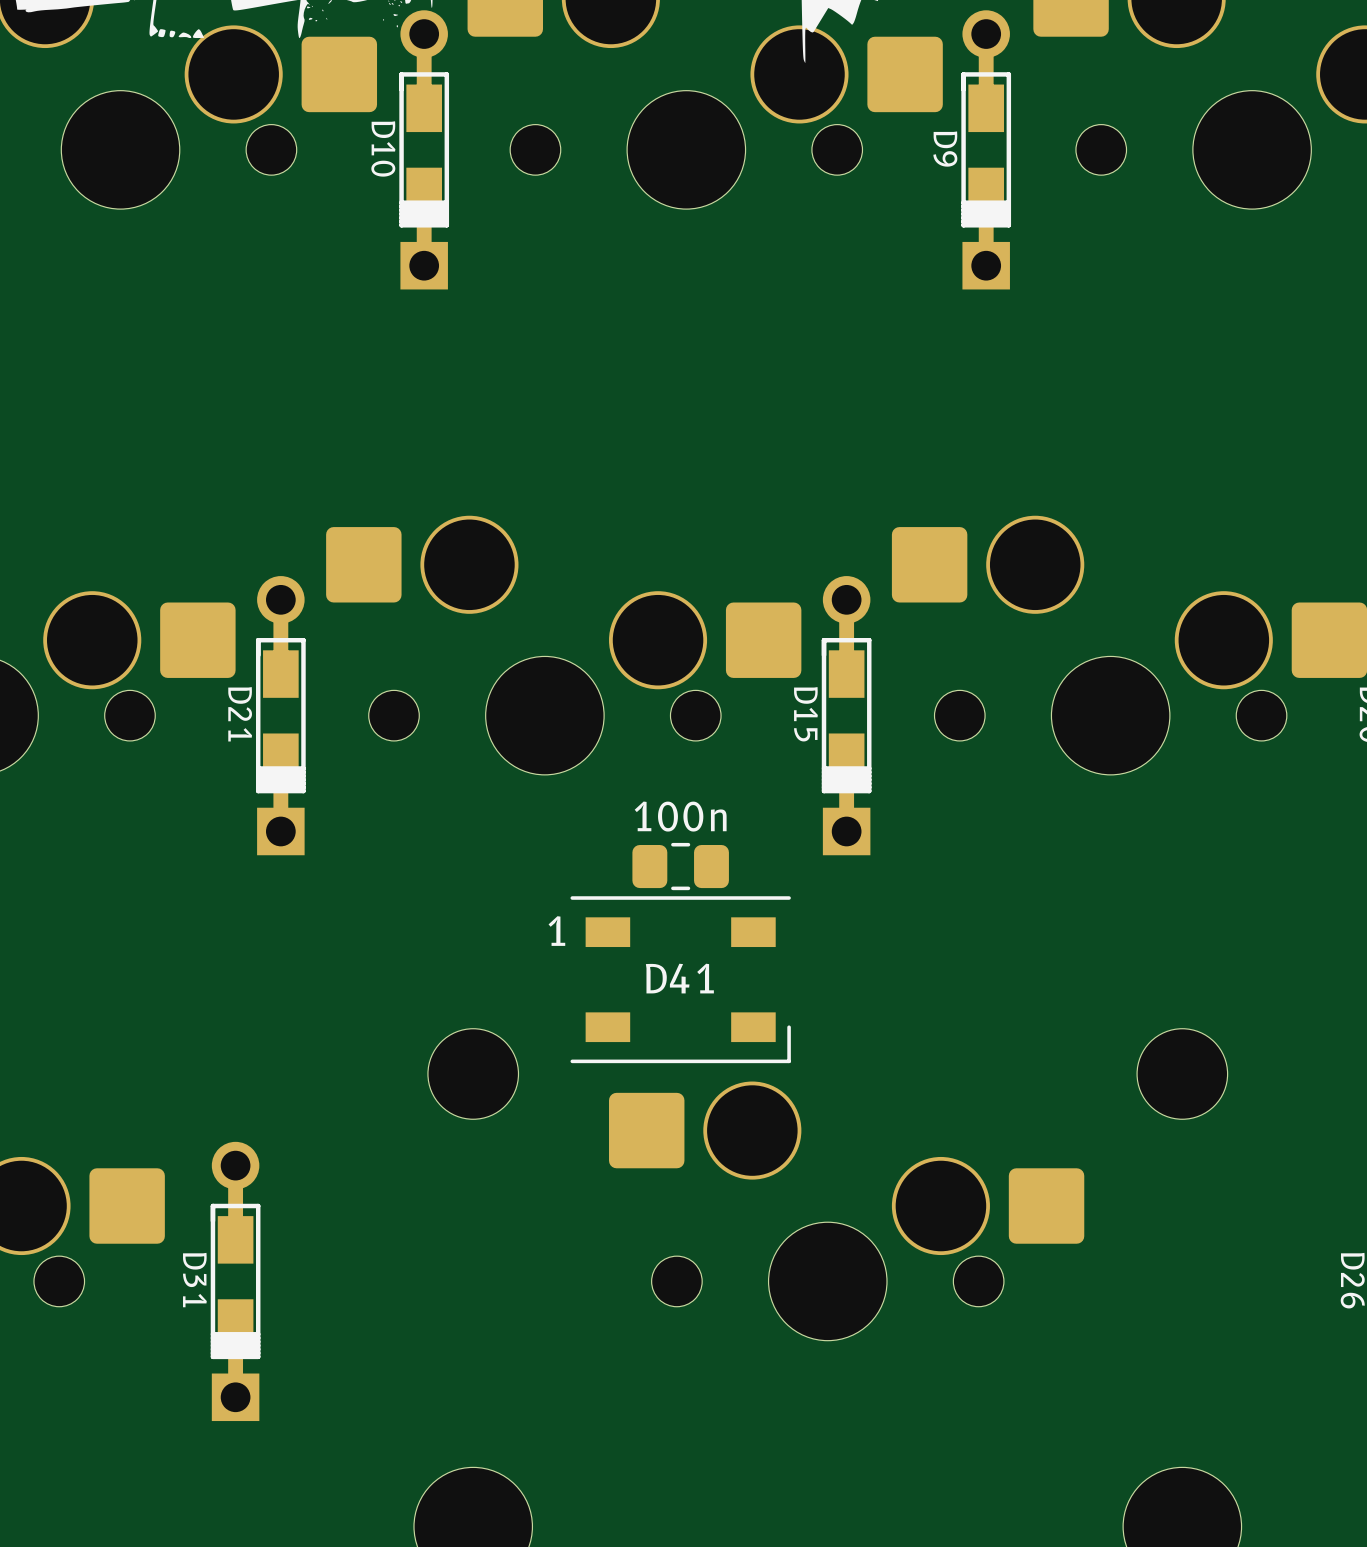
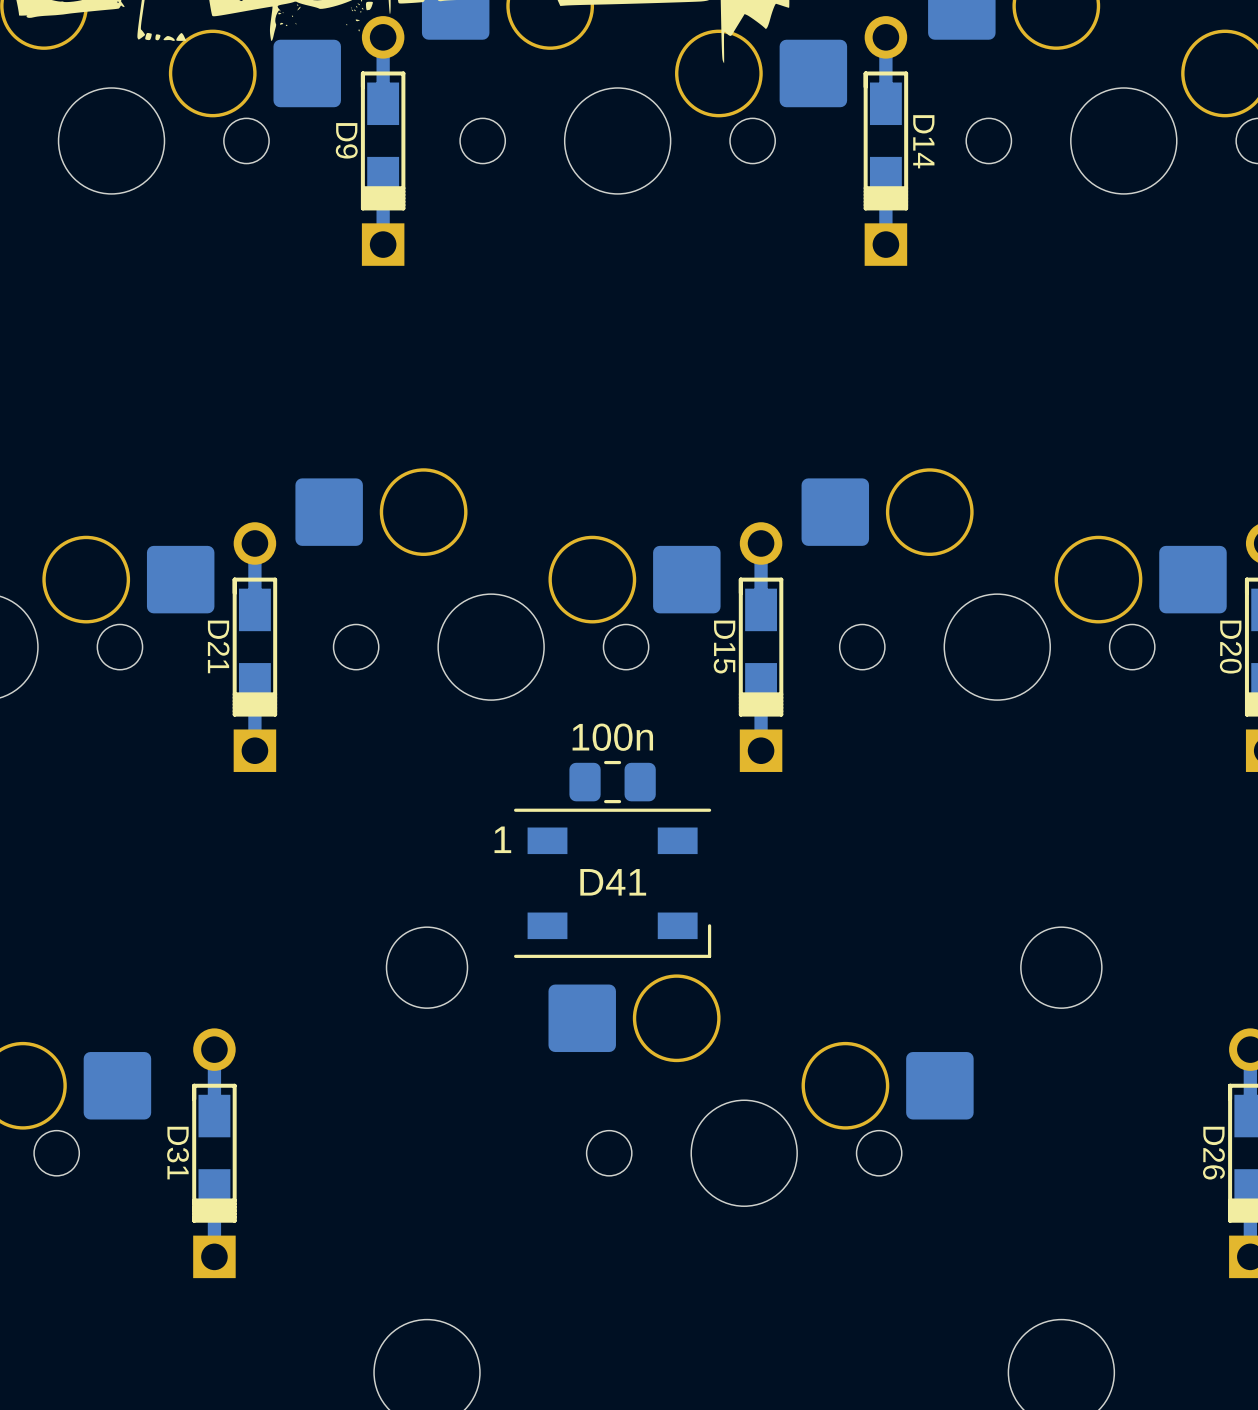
D10 name: D10 (383, 148) -> D9 (346, 140)
D9 name: D9 (945, 149) -> D14 (923, 141)

